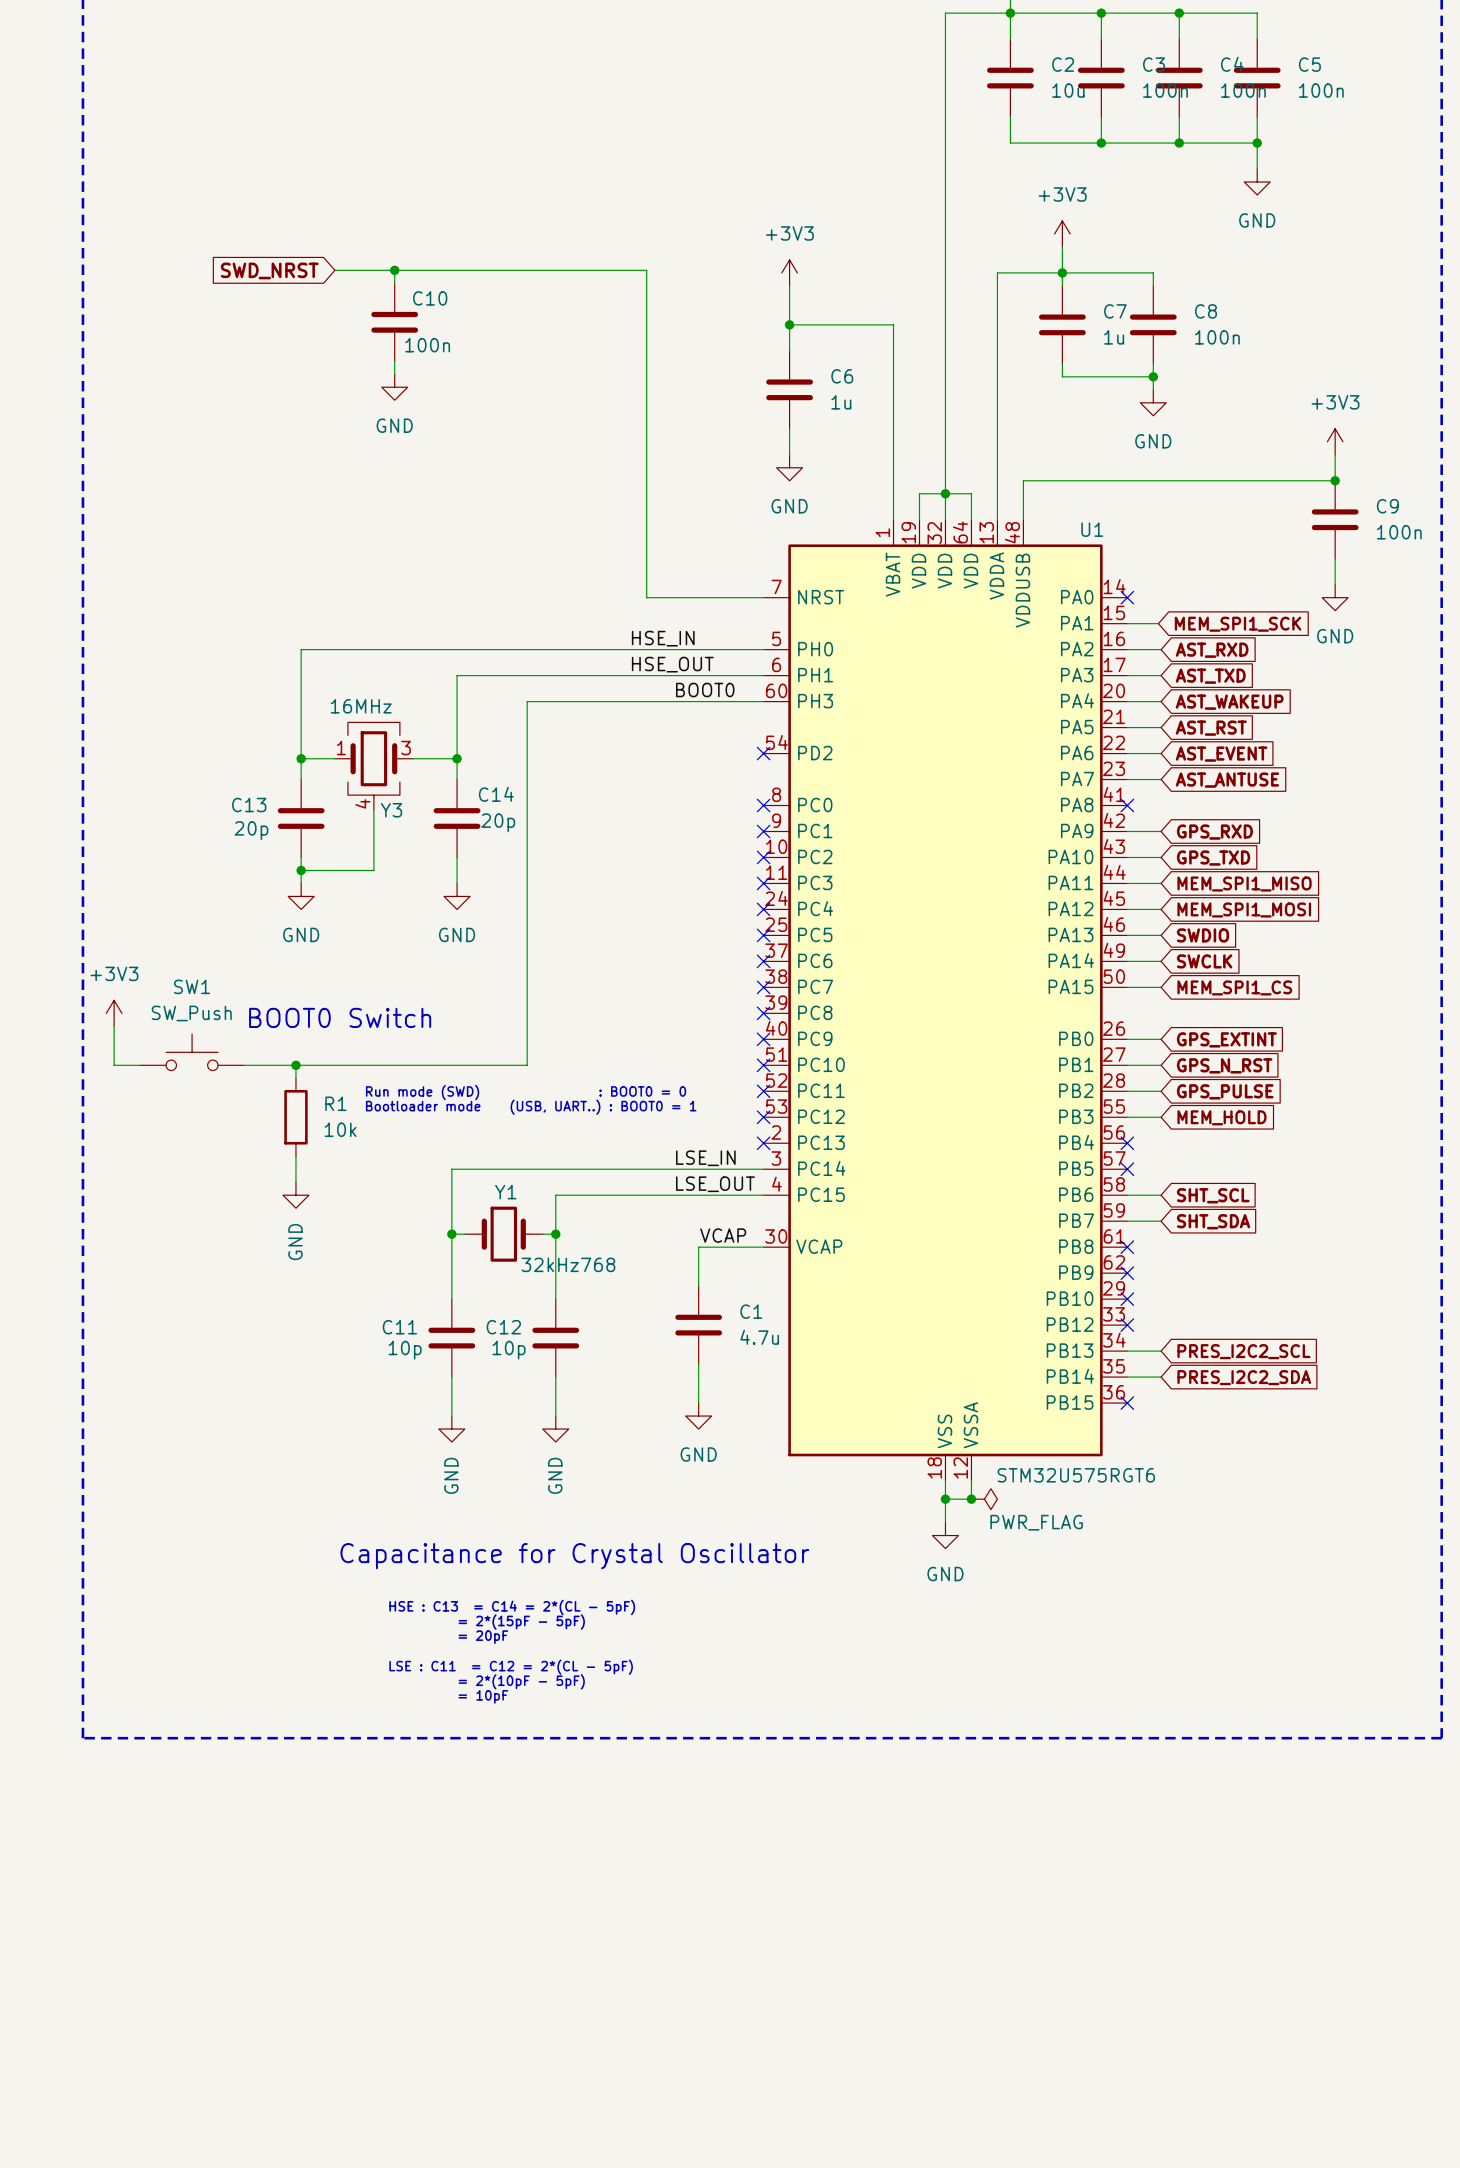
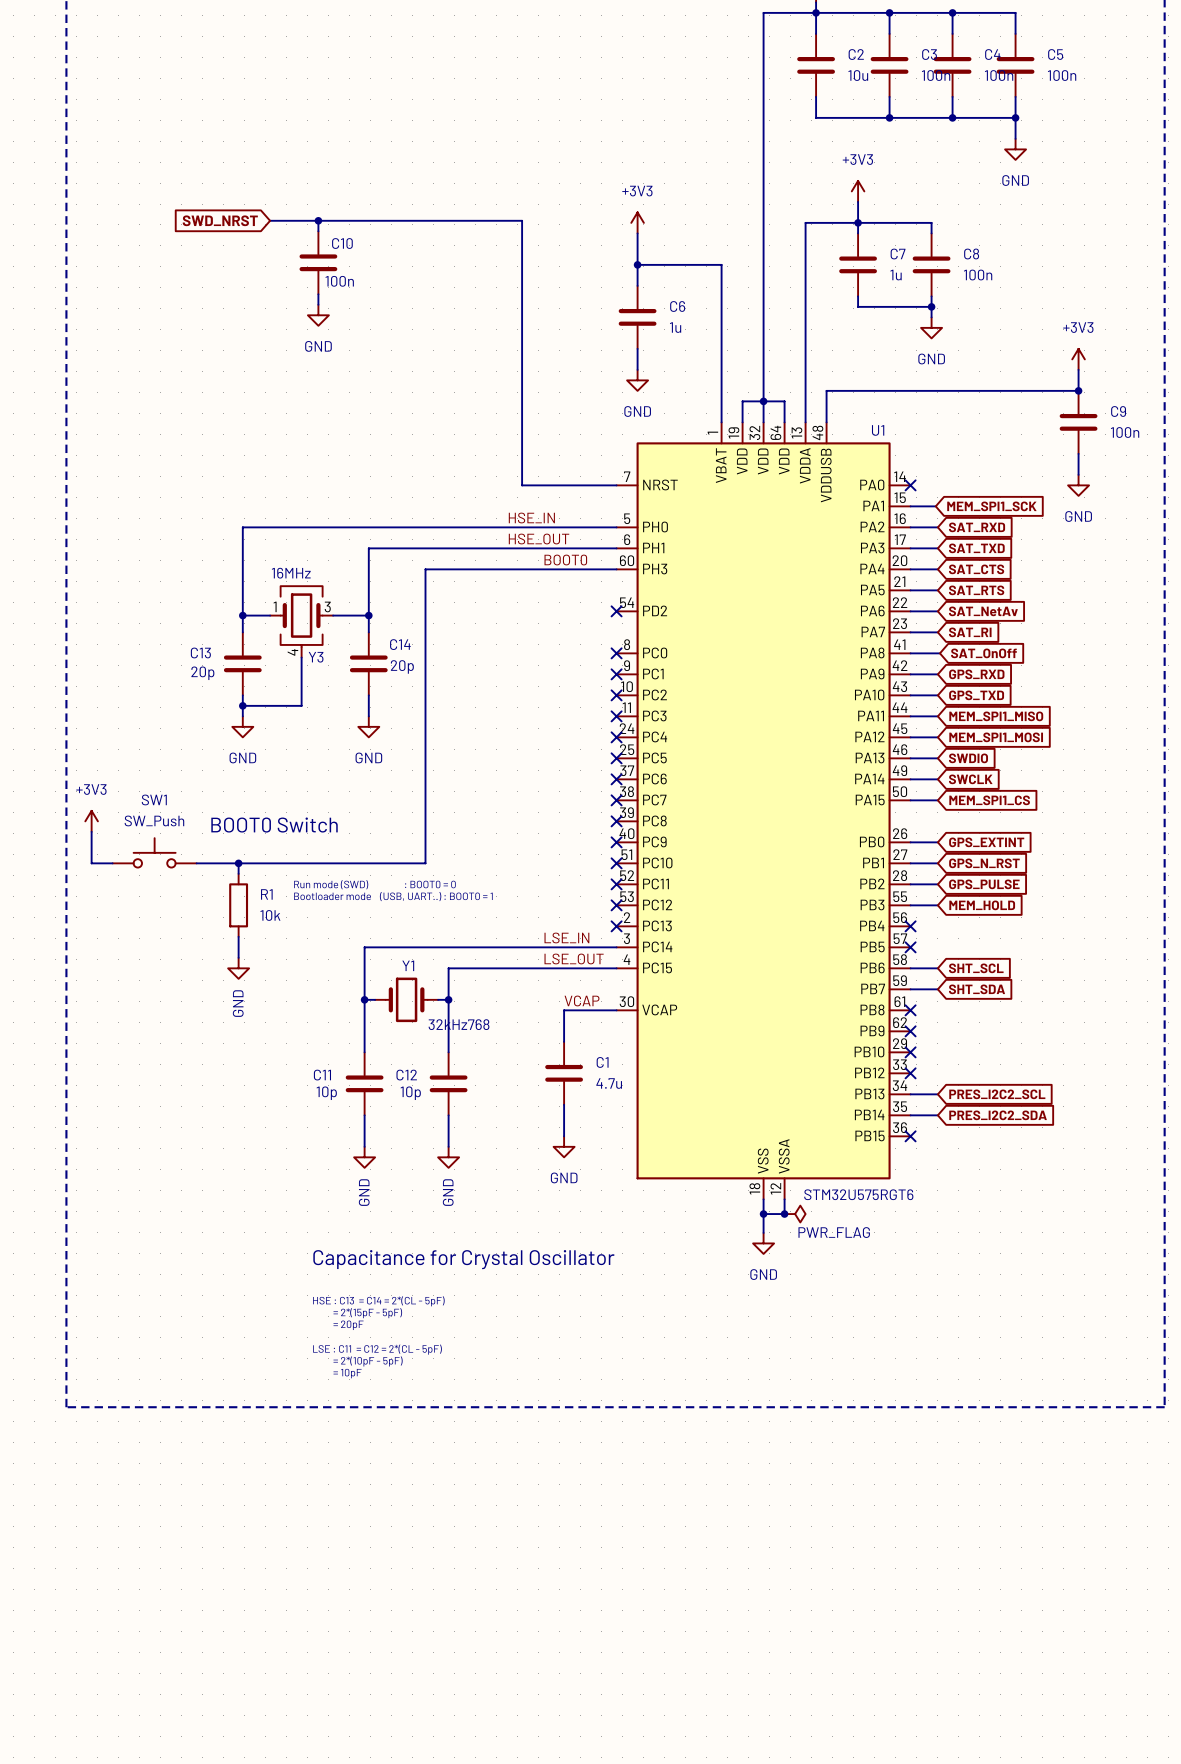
global label: AST_RXD (1212, 650) -> SAT_RXD (977, 527)
global label: AST_TXD (1210, 676) -> SAT_TXD (976, 548)
global label: AST_WAKEUP (1229, 702) -> SAT_CTS (976, 569)
global label: AST_RST (1211, 728) -> SAT_RTS (976, 590)
global label: AST_EVENT (1221, 754) -> SAT_NetAv (983, 611)
global label: AST_ANTUSE (1227, 780) -> SAT_RI (970, 632)
wire: none -> (910, 653) (939, 653)
no-connect mark: (1127, 805) -> none
global label: none -> SAT_OnOff (983, 653)

